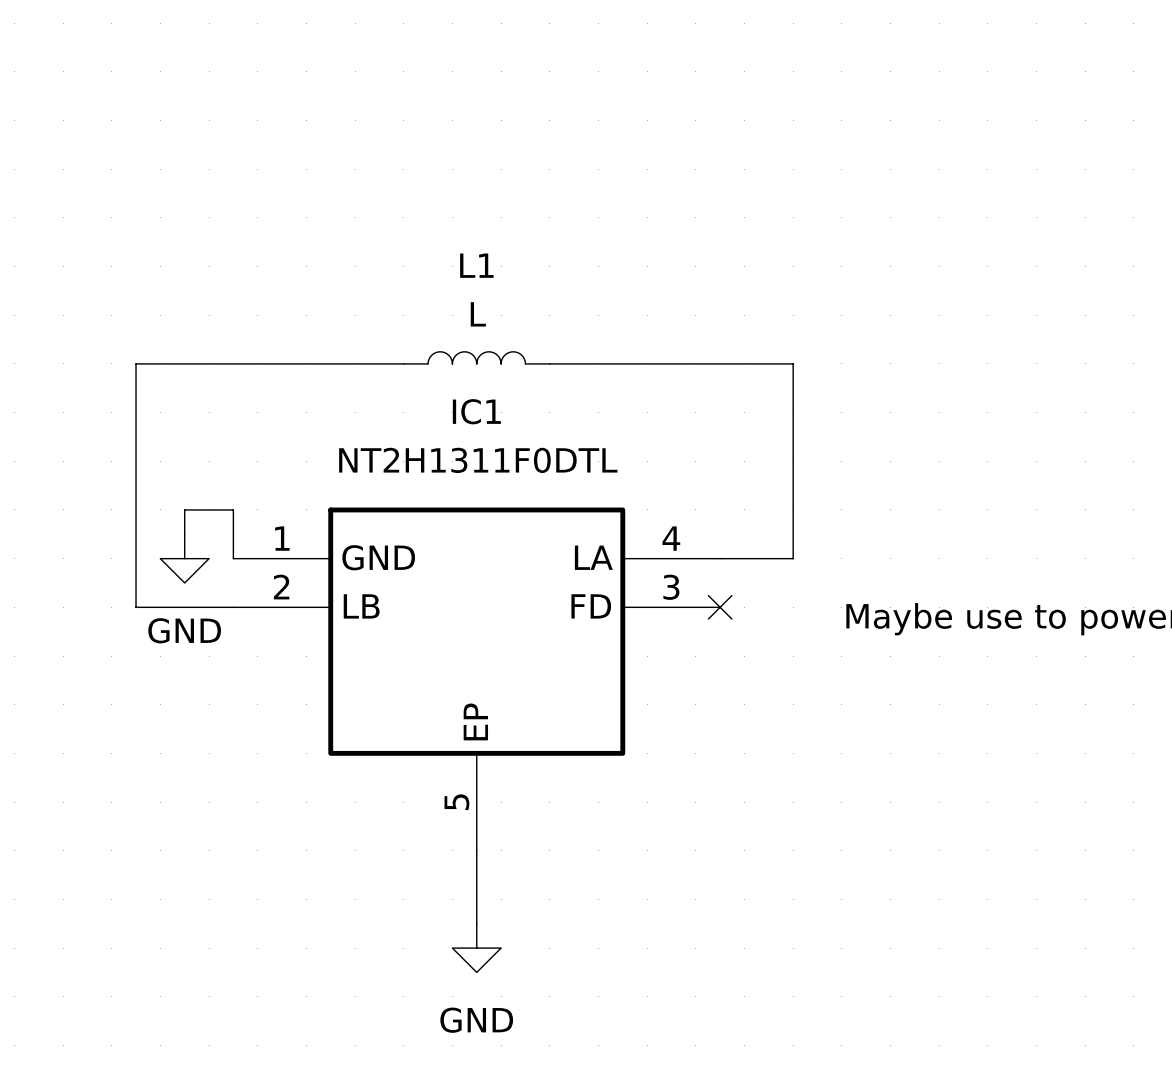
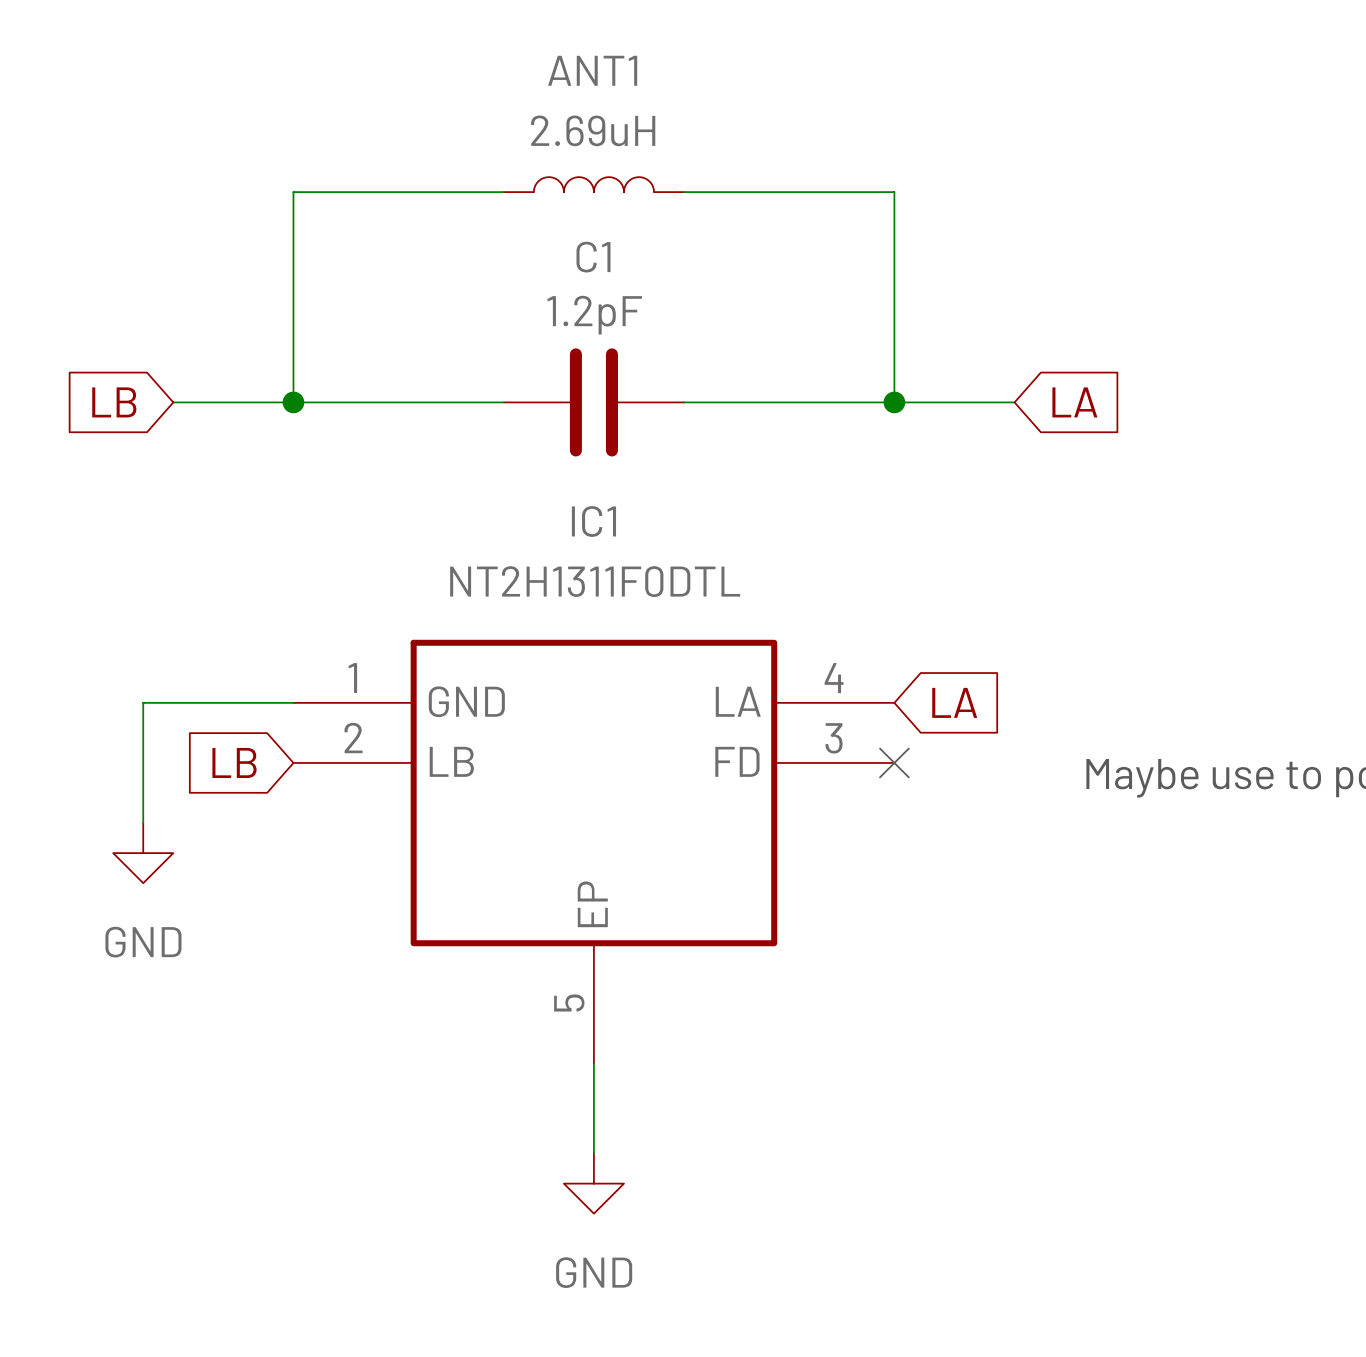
ANT1: none -> 2.69uH (593, 184)
wire: none -> (503, 192) (293, 192) (293, 402)
wire: none -> (684, 192) (894, 192) (894, 402)
global label: none -> LB (114, 402)
wire: none -> (173, 402) (503, 402)
junction: none -> (293, 402)
C1: none -> 1.2pF (593, 402)
wire: none -> (684, 402) (1014, 402)
junction: none -> (894, 402)
global label: none -> LA (1074, 402)
L1: L (476, 357) -> none
wire: (403, 363) (136, 363) (136, 607) (233, 607) -> none
wire: (549, 363) (793, 363) (793, 558) (720, 558) -> none
wire: (184, 534) (184, 509) (233, 509) (233, 558) -> (143, 823) (143, 702) (293, 702)
power symbol position: GND (184, 558) -> GND (143, 853)
global label: none -> LA (954, 702)
global label: none -> LB (234, 762)

